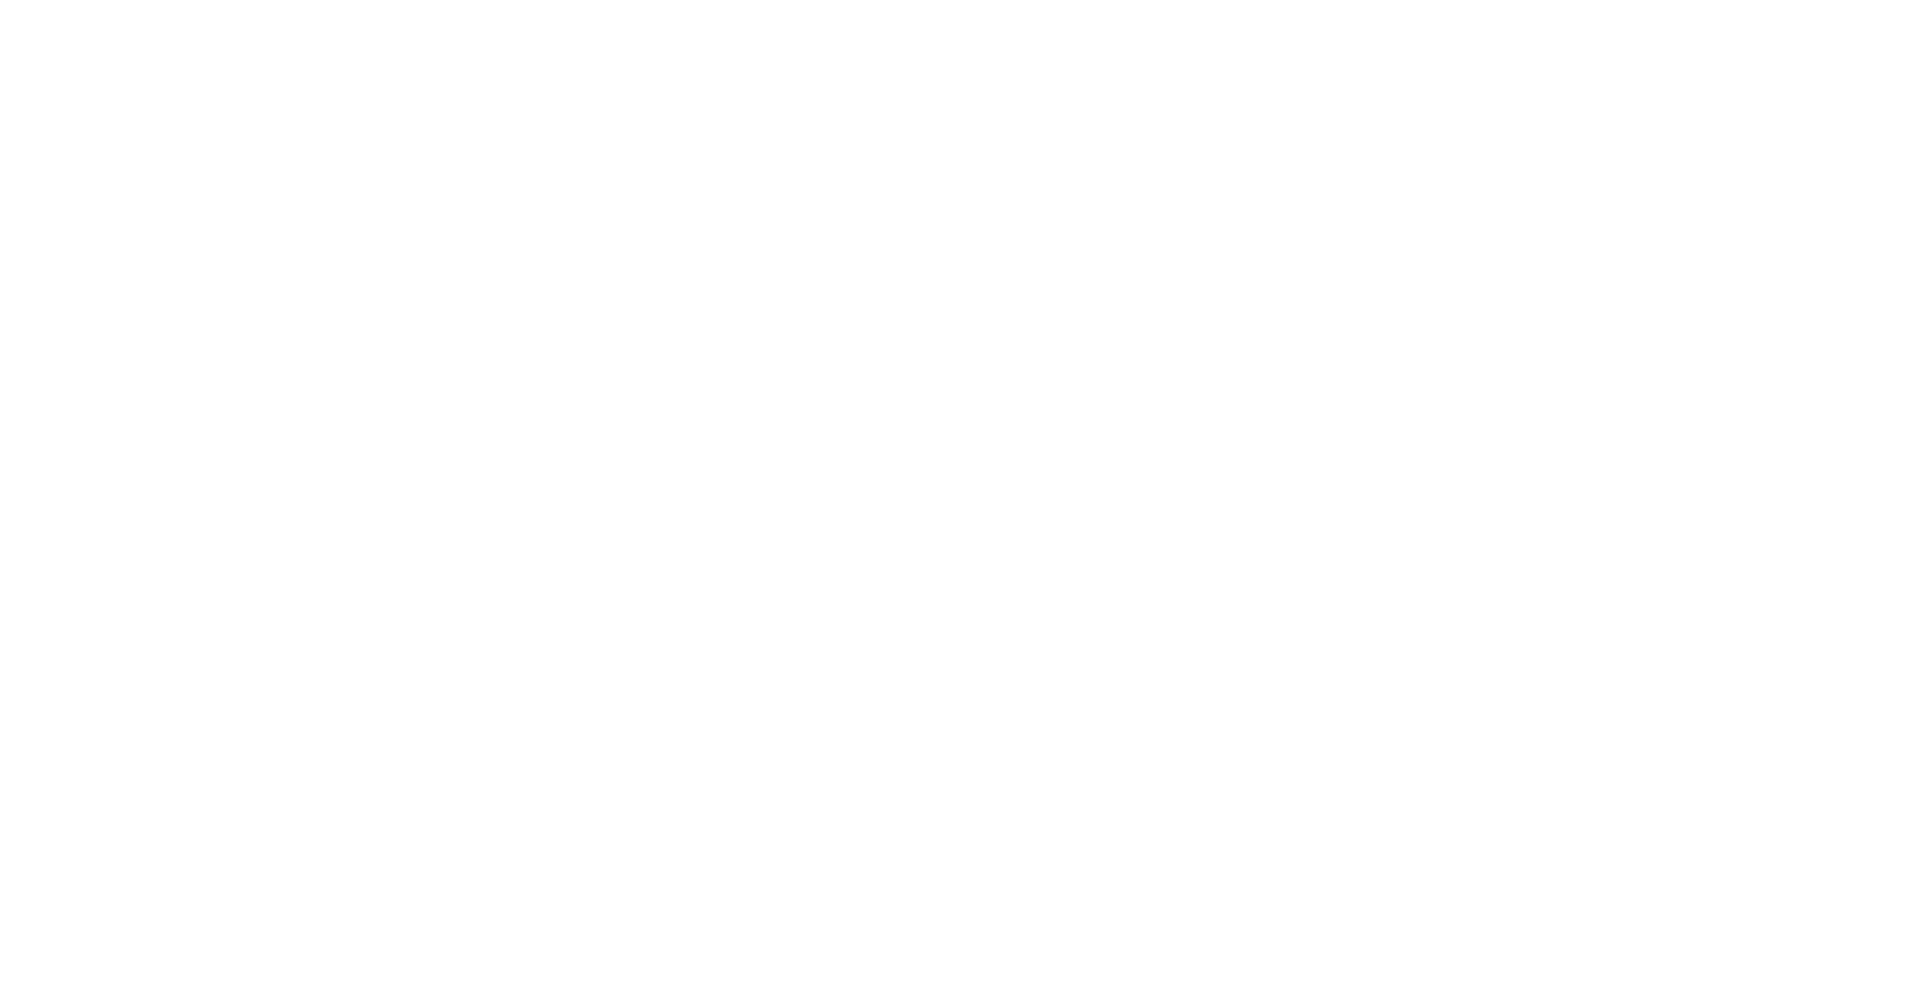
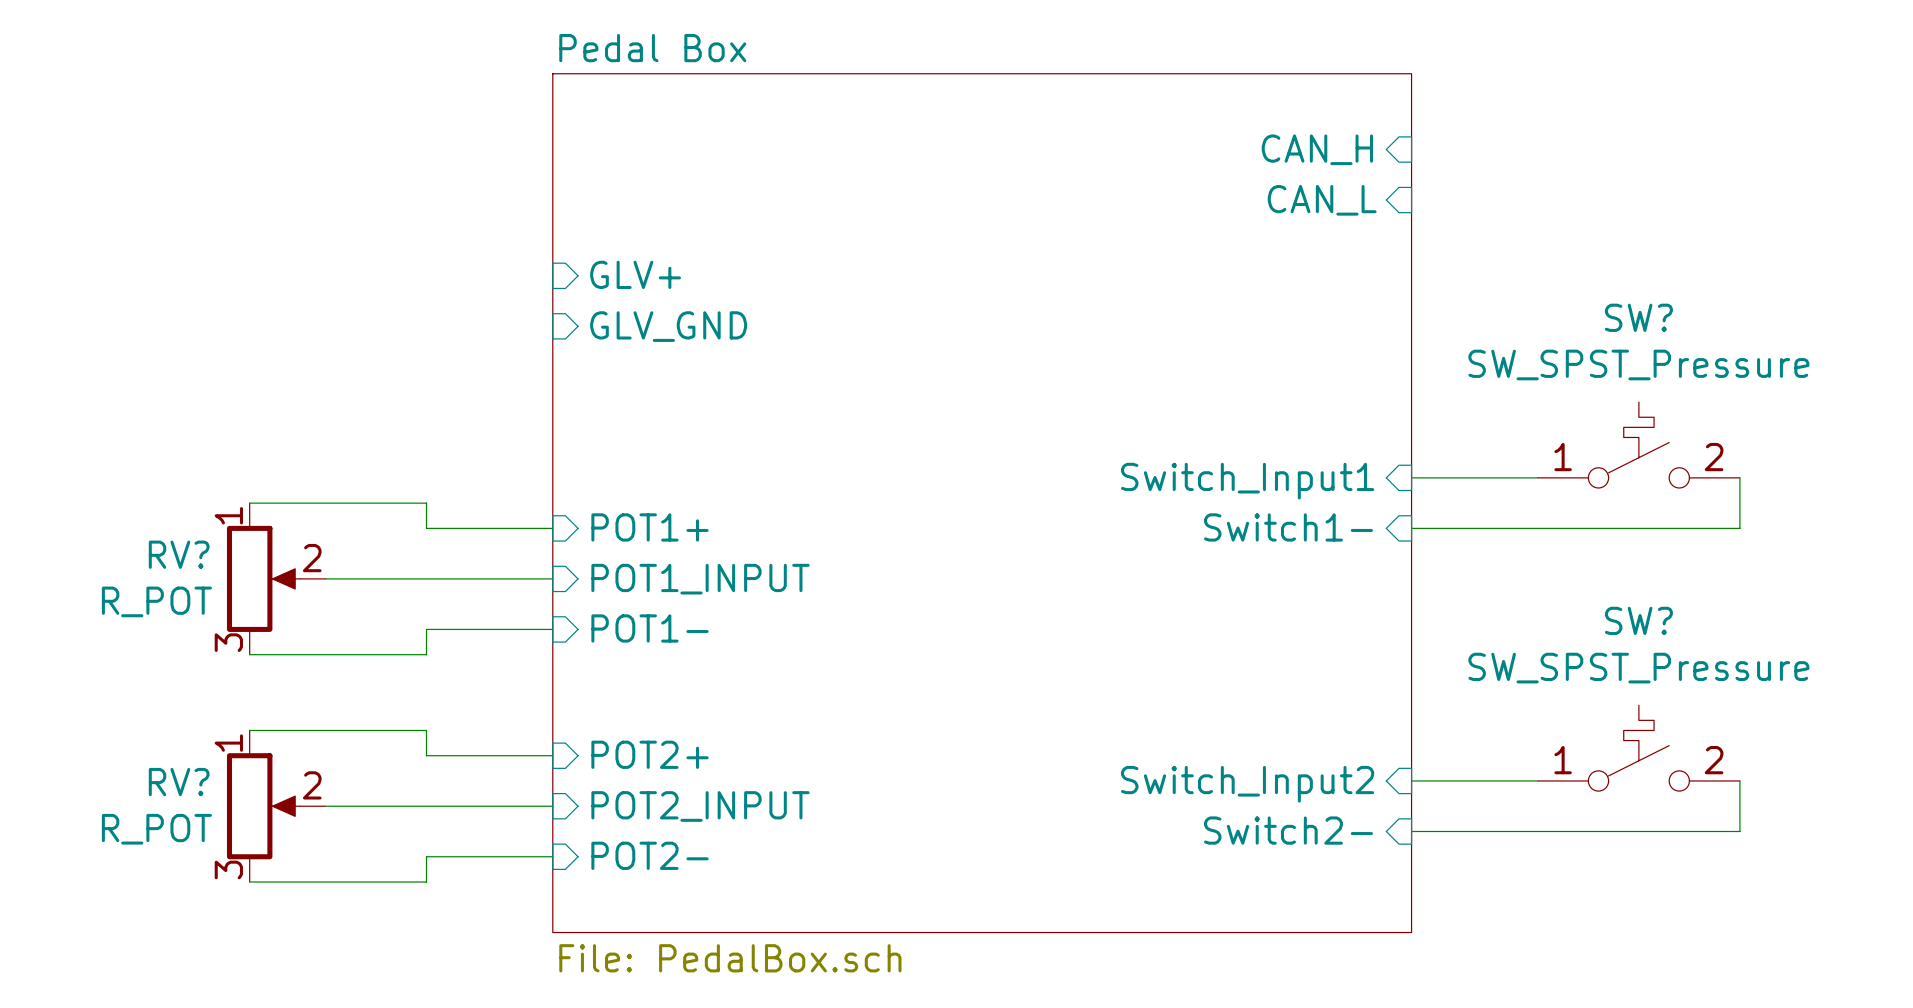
sheet pin: none -> CAN_H (1317, 149)
sheet pin: none -> CAN_L (1322, 200)
sheet pin: none -> GLV+ (635, 274)
sheet pin: none -> GLV_GND (668, 326)
SW?: none -> SW_SPST_Pressure (1638, 445)
wire: none -> (1411, 477) (1537, 477)
wire: none -> (1739, 477) (1739, 528) (1411, 528)
sheet pin: none -> Switch_Input1 (1247, 481)
wire: none -> (249, 503) (426, 503) (426, 528) (552, 528)
sheet Pedal Box: none -> File: PedalBox.sch (982, 503)
sheet pin: none -> POT1+ (650, 527)
sheet pin: none -> Switch1- (1288, 527)
RV?: none -> R_POT (276, 578)
wire: none -> (325, 578) (552, 578)
sheet pin: none -> POT1_INPUT (700, 579)
sheet pin: none -> POT1- (650, 628)
wire: none -> (552, 629) (426, 629) (426, 654) (249, 654)
wire: none -> (249, 730) (426, 730) (426, 755) (552, 755)
SW?: none -> SW_SPST_Pressure (1638, 748)
sheet pin: none -> POT2+ (650, 754)
wire: none -> (1411, 780) (1537, 780)
wire: none -> (1739, 780) (1739, 831) (1411, 831)
sheet pin: none -> Switch_Input2 (1247, 784)
RV?: none -> R_POT (276, 806)
wire: none -> (325, 806) (552, 806)
sheet pin: none -> POT2_INPUT (700, 806)
sheet pin: none -> Switch2- (1288, 830)
sheet pin: none -> POT2- (650, 855)
wire: none -> (552, 856) (426, 856) (426, 882) (249, 882)

